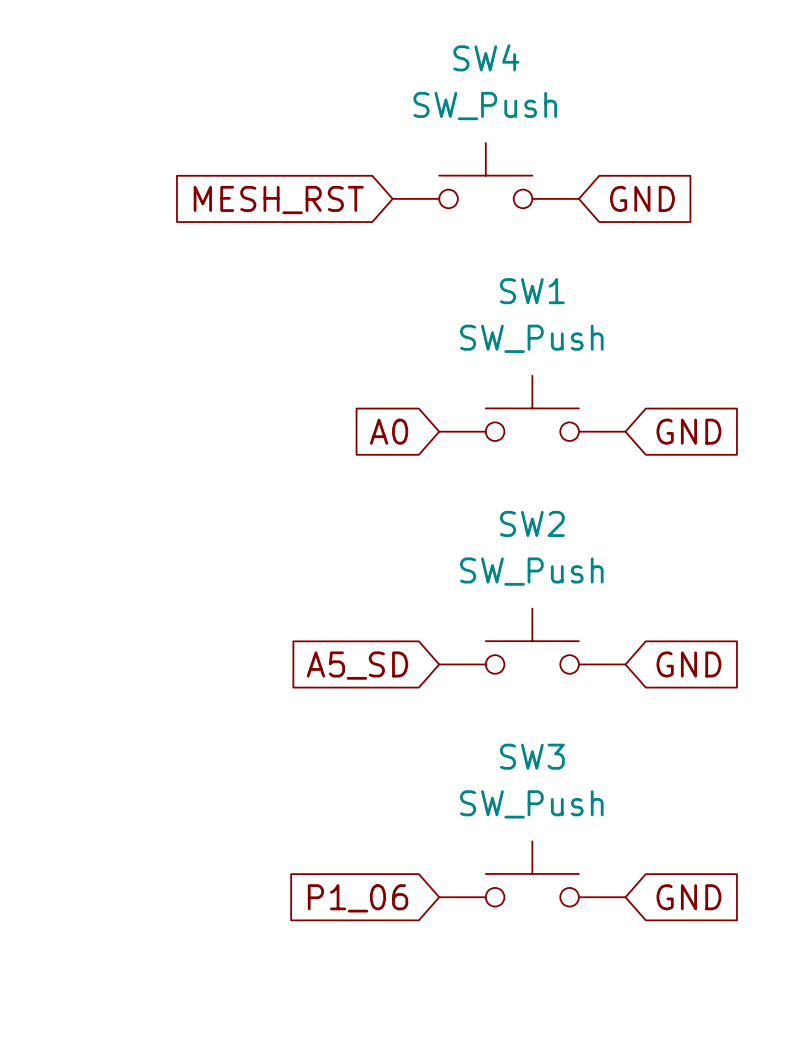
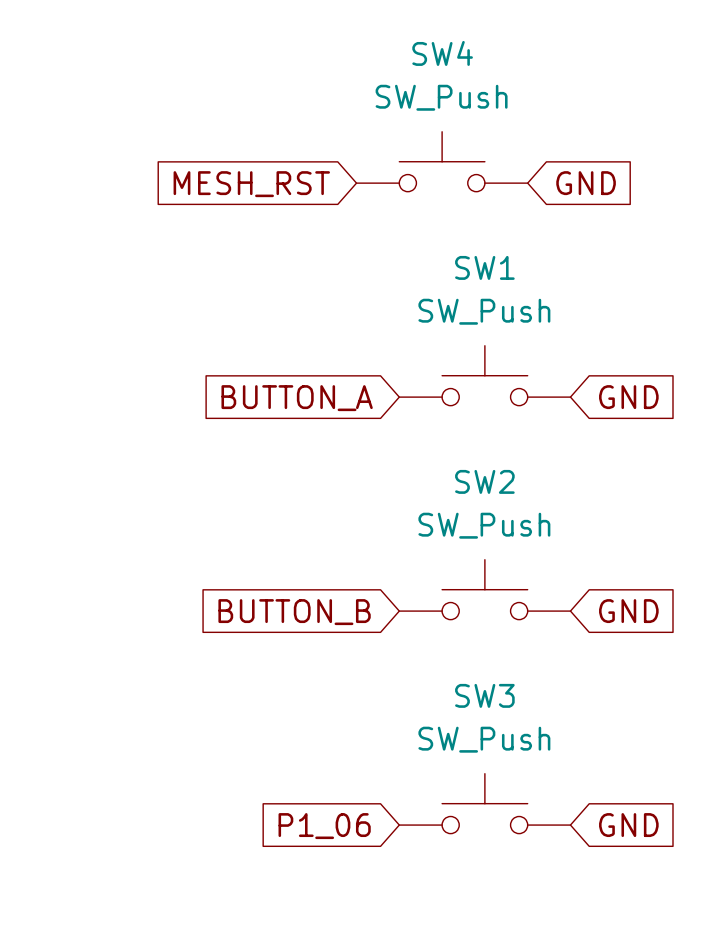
global label: A0 (389, 431) -> BUTTON_A (297, 398)
global label: A5_SD (357, 665) -> BUTTON_B (294, 612)

